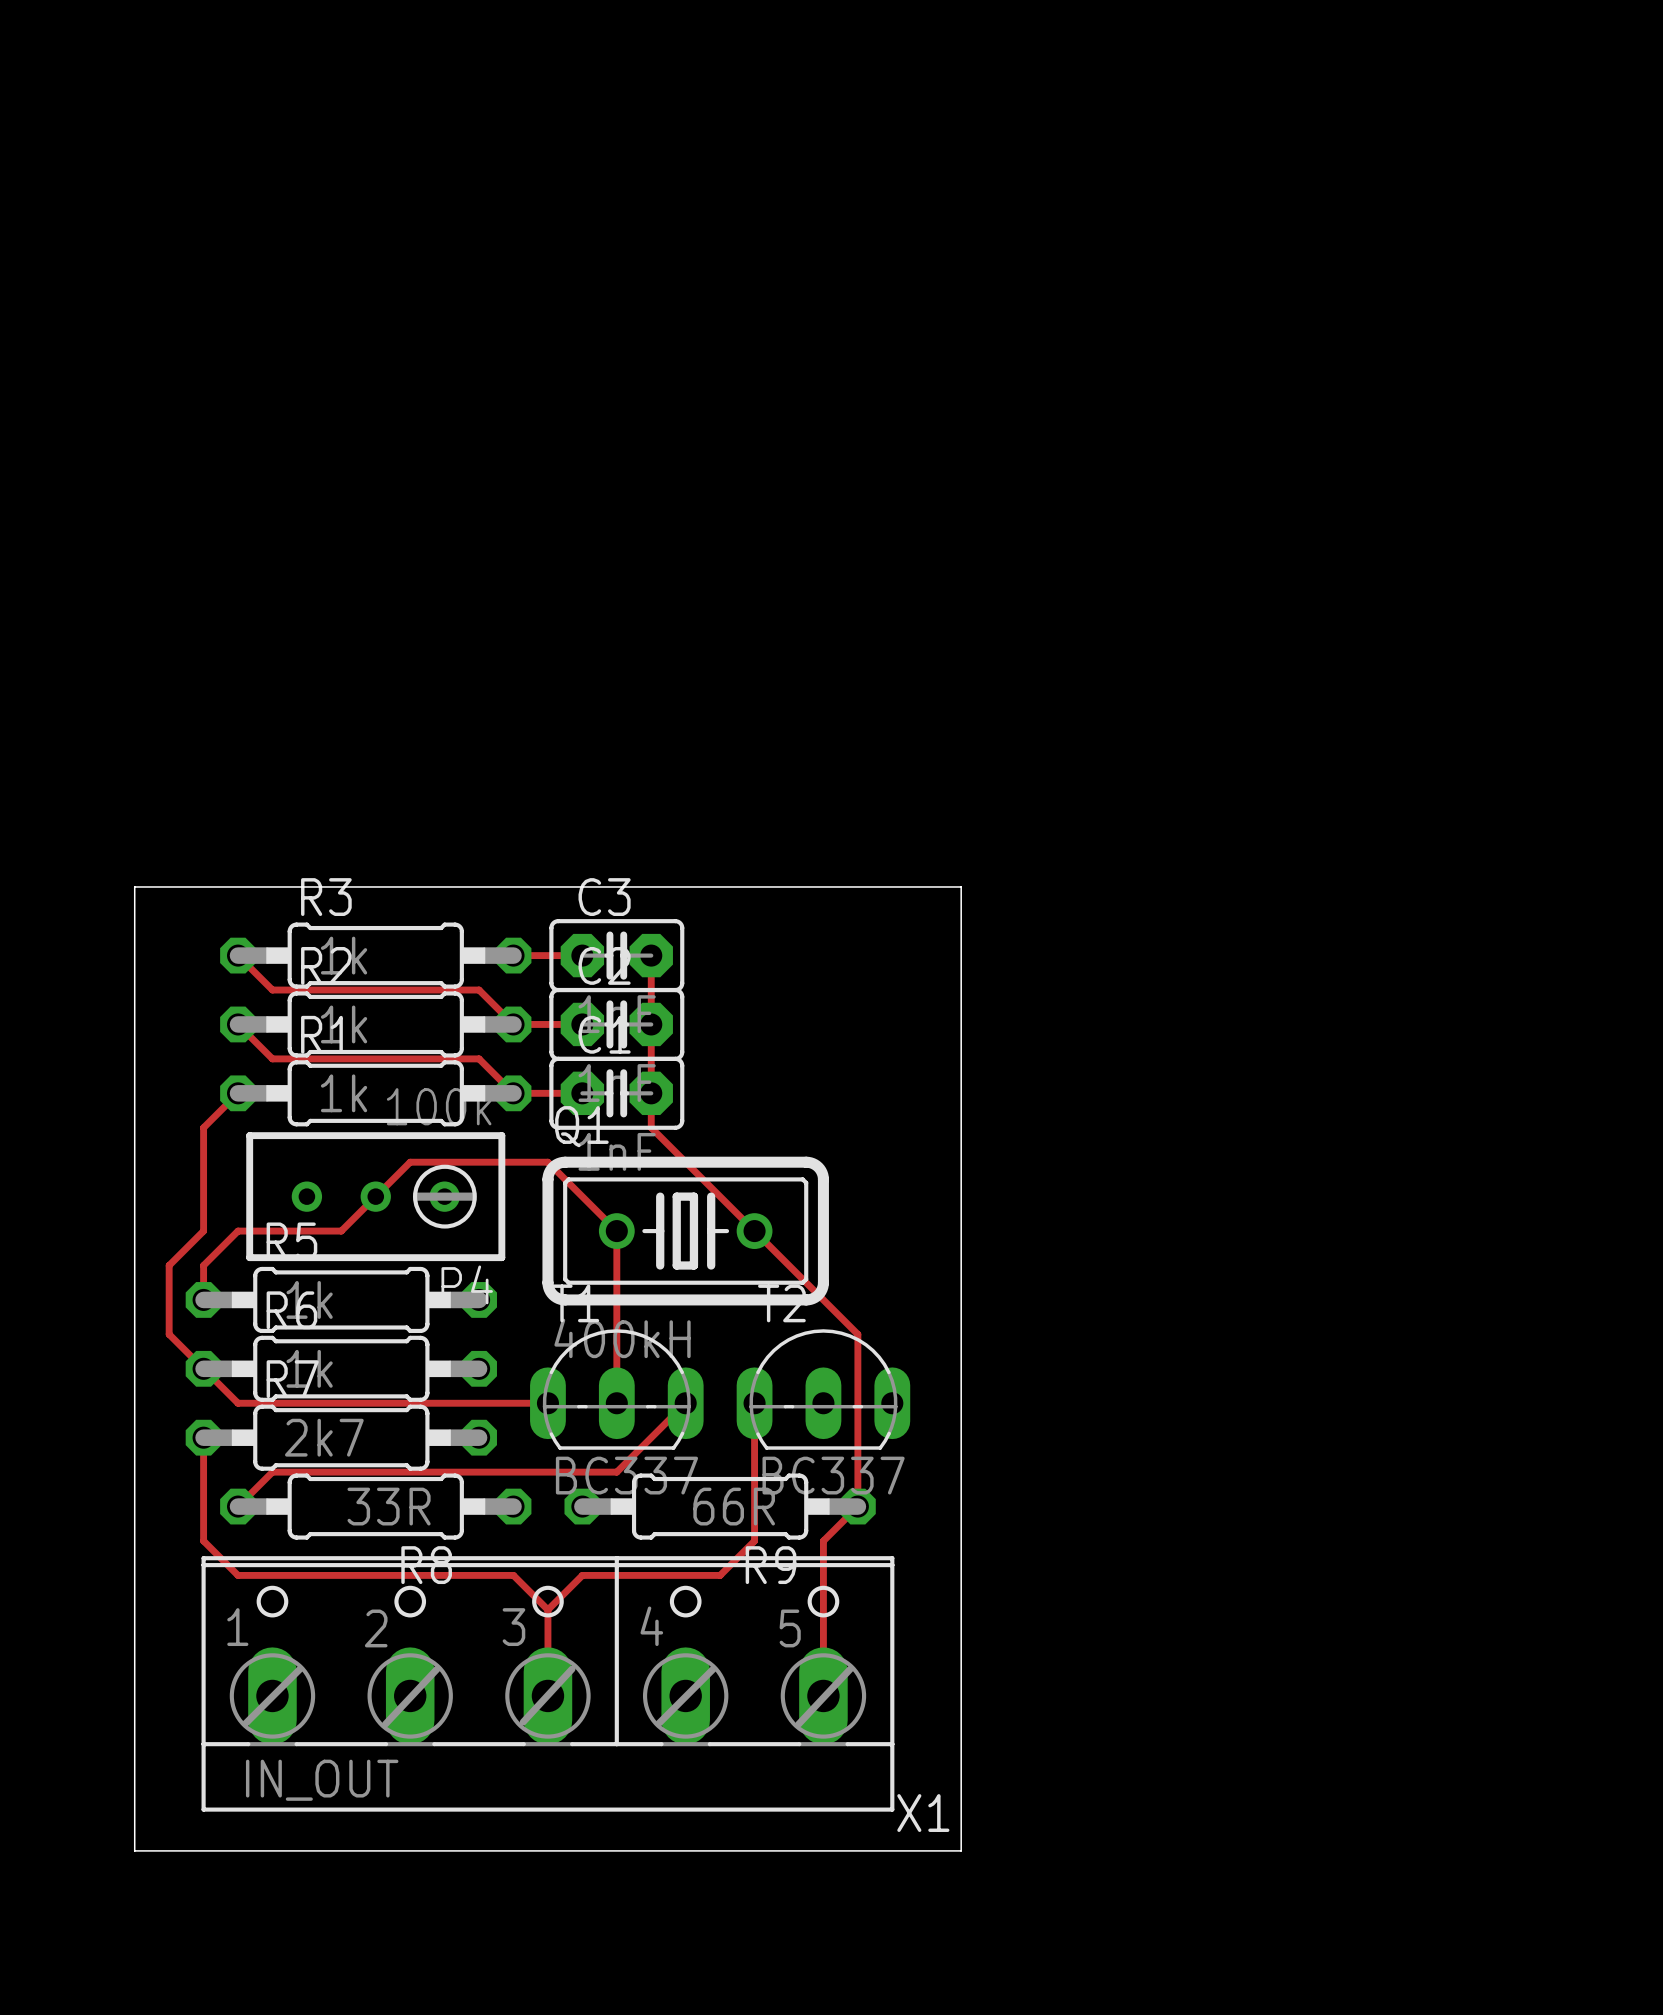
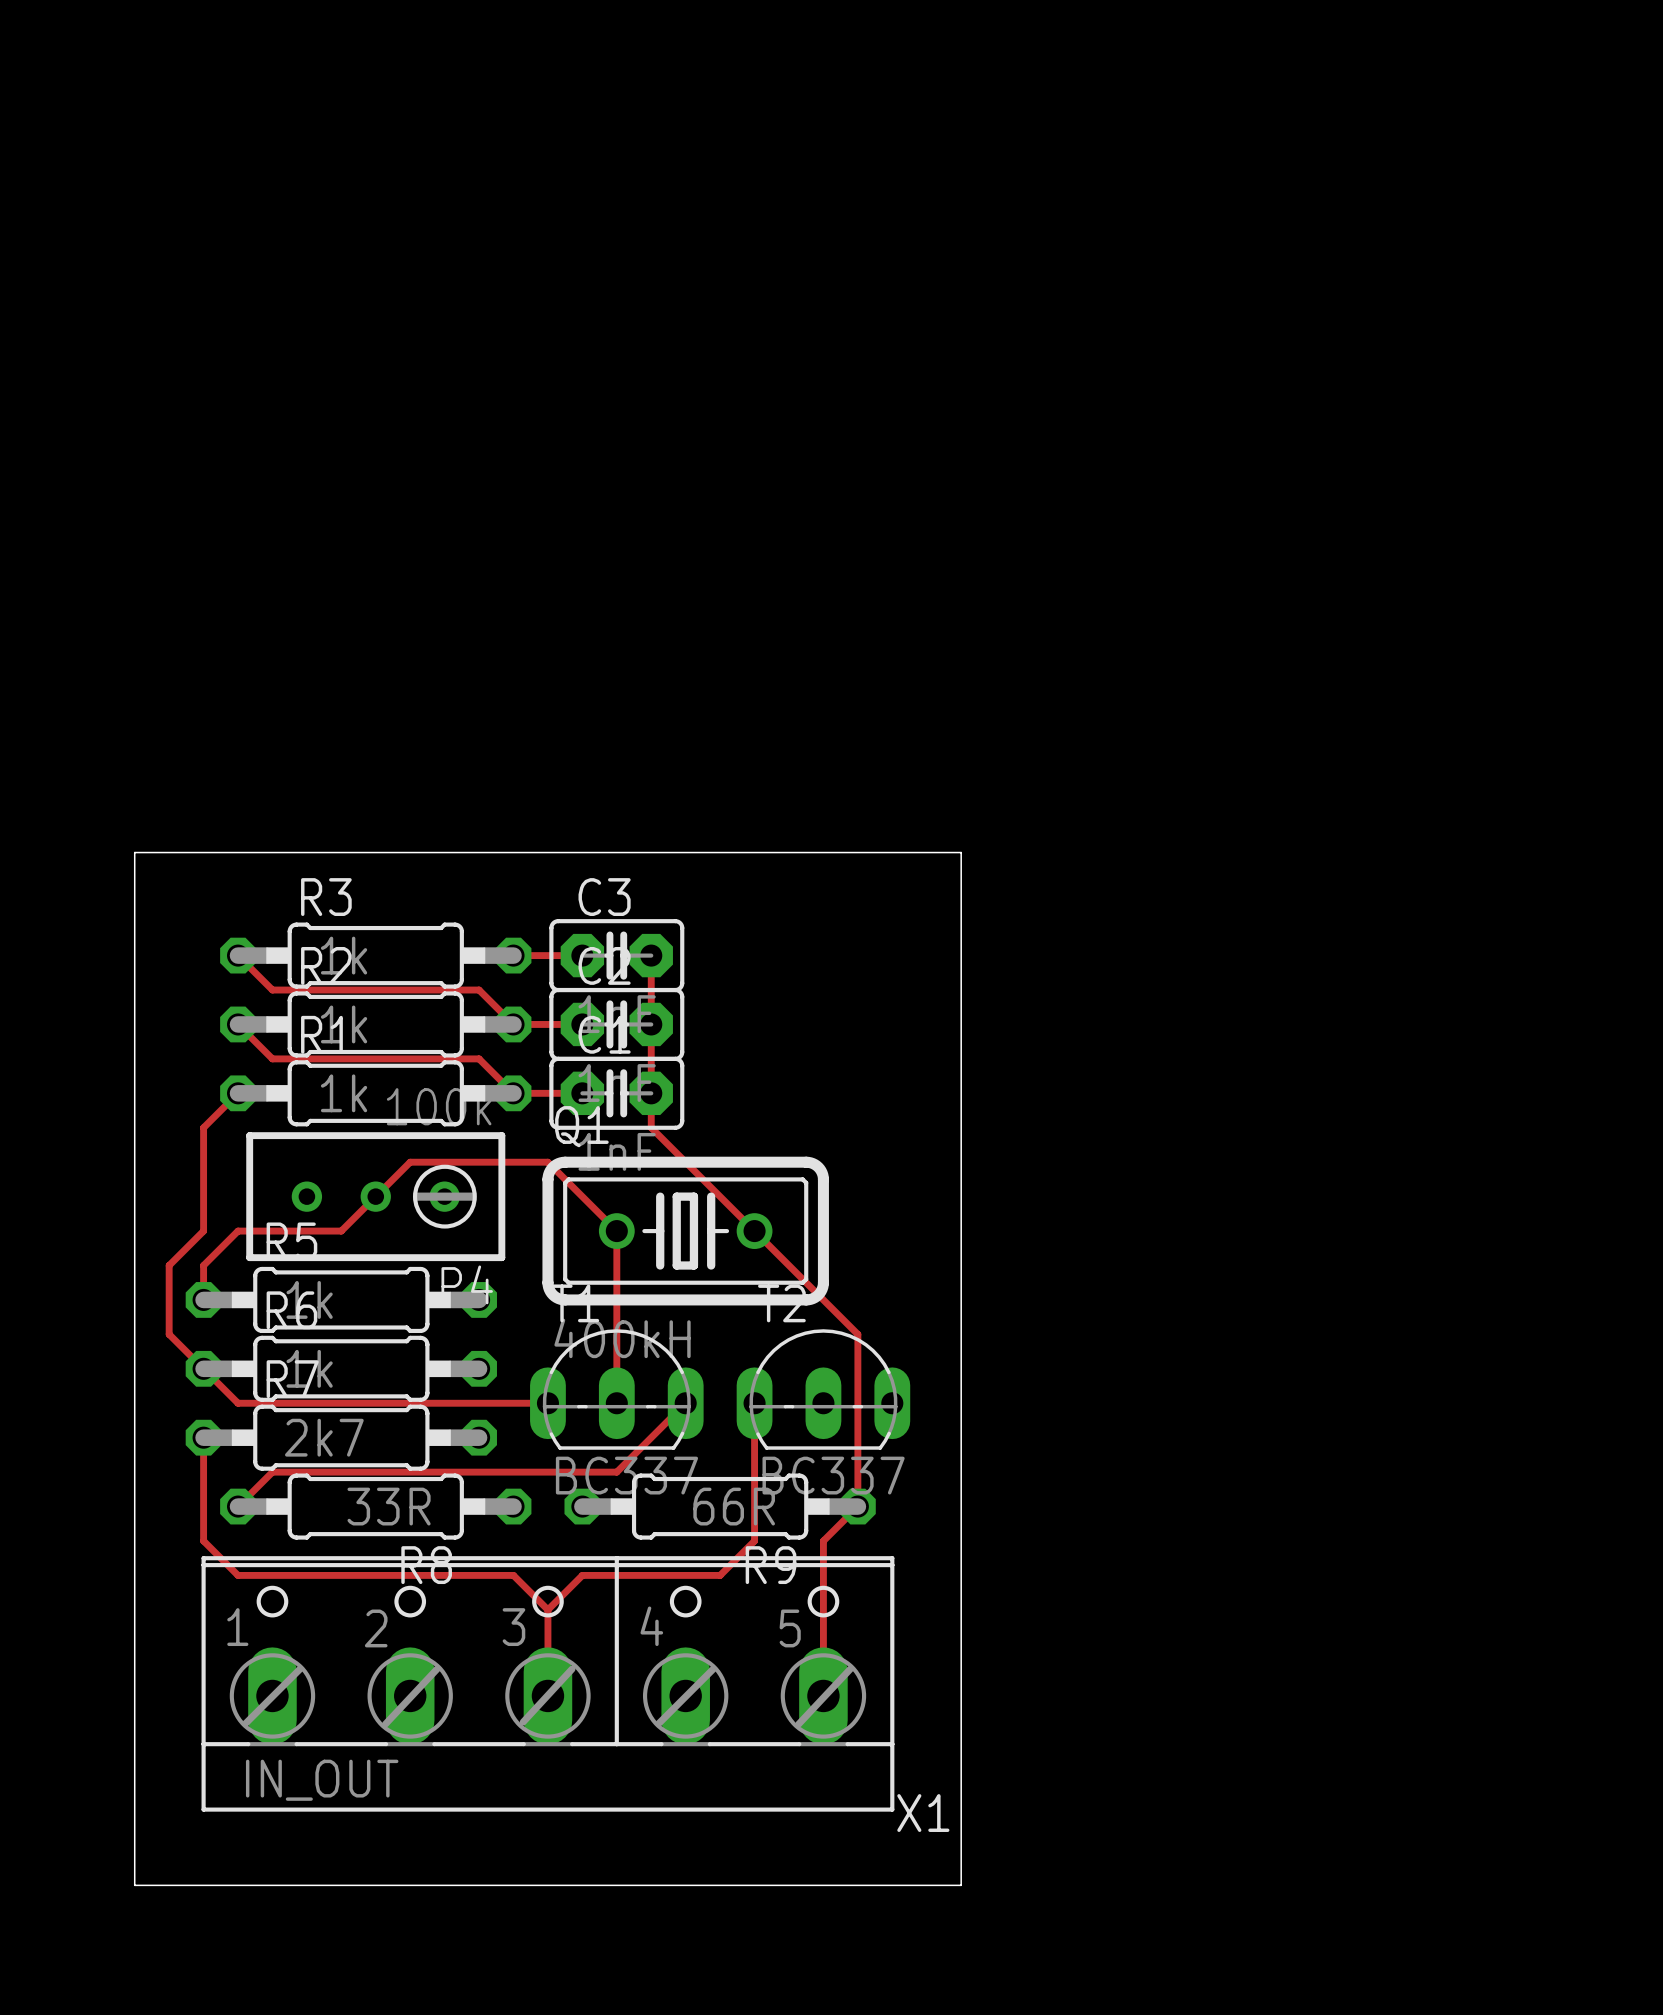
board edge: (134, 886) (961, 886) -> (134, 886) (134, 852) (961, 852) (961, 886)
board edge: (134, 1850) (961, 1850) -> (134, 1850) (134, 1885) (961, 1885) (961, 1850)

